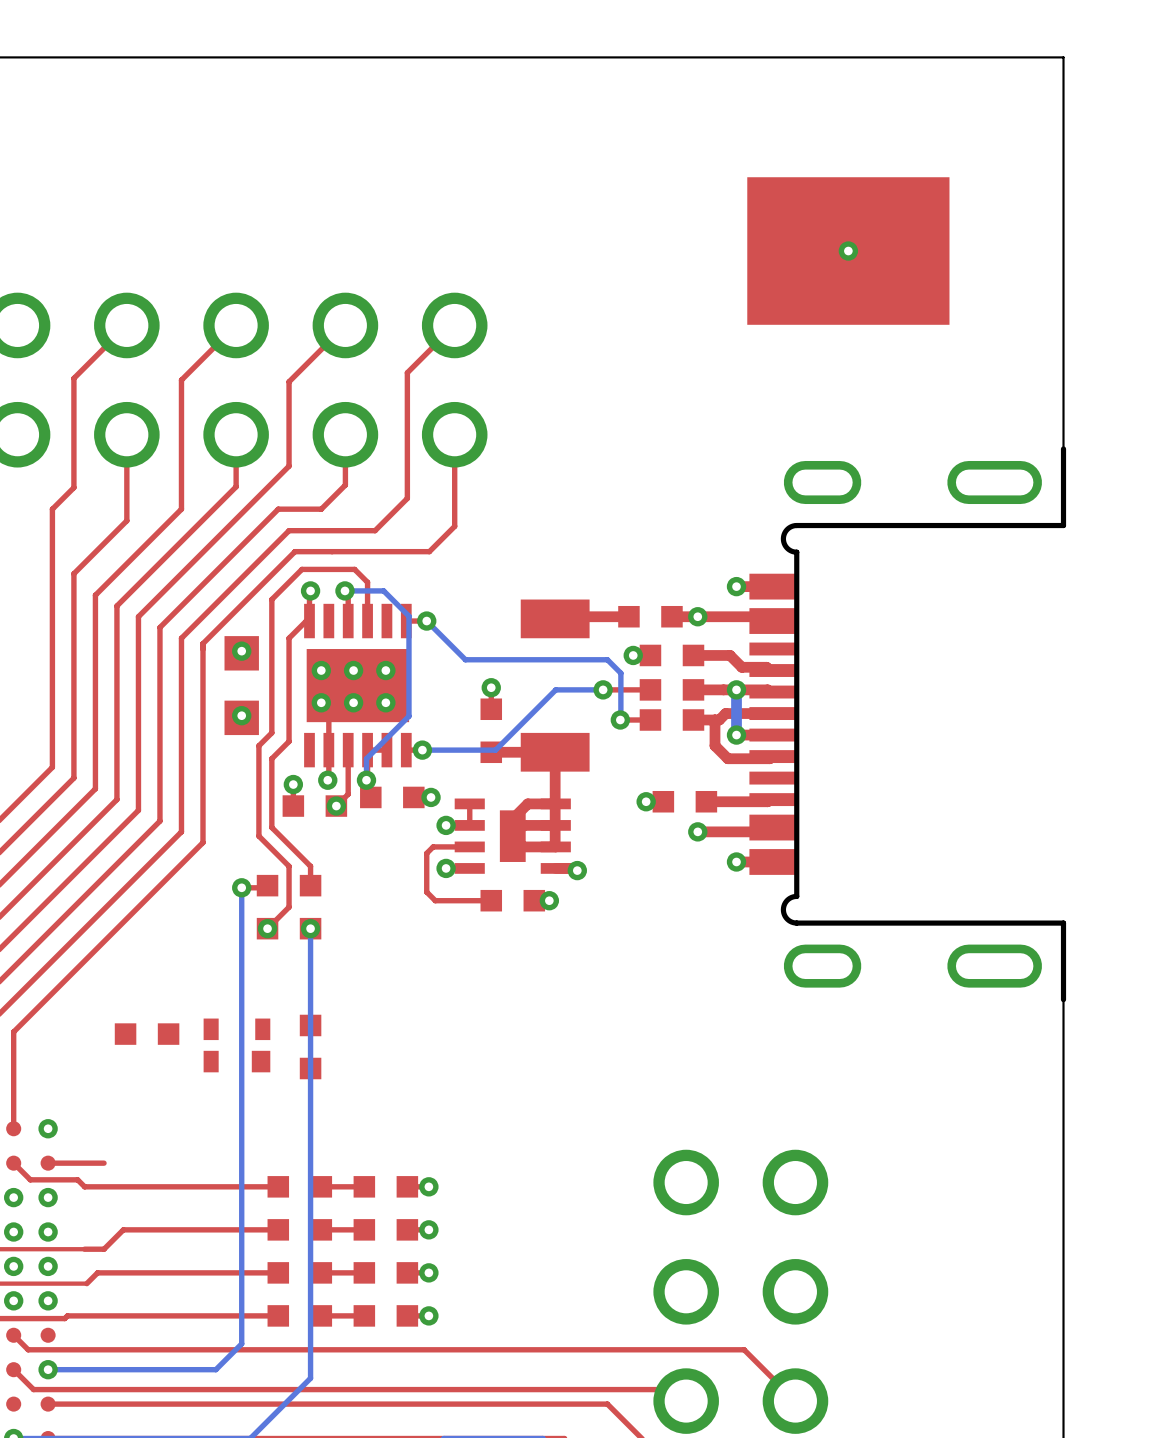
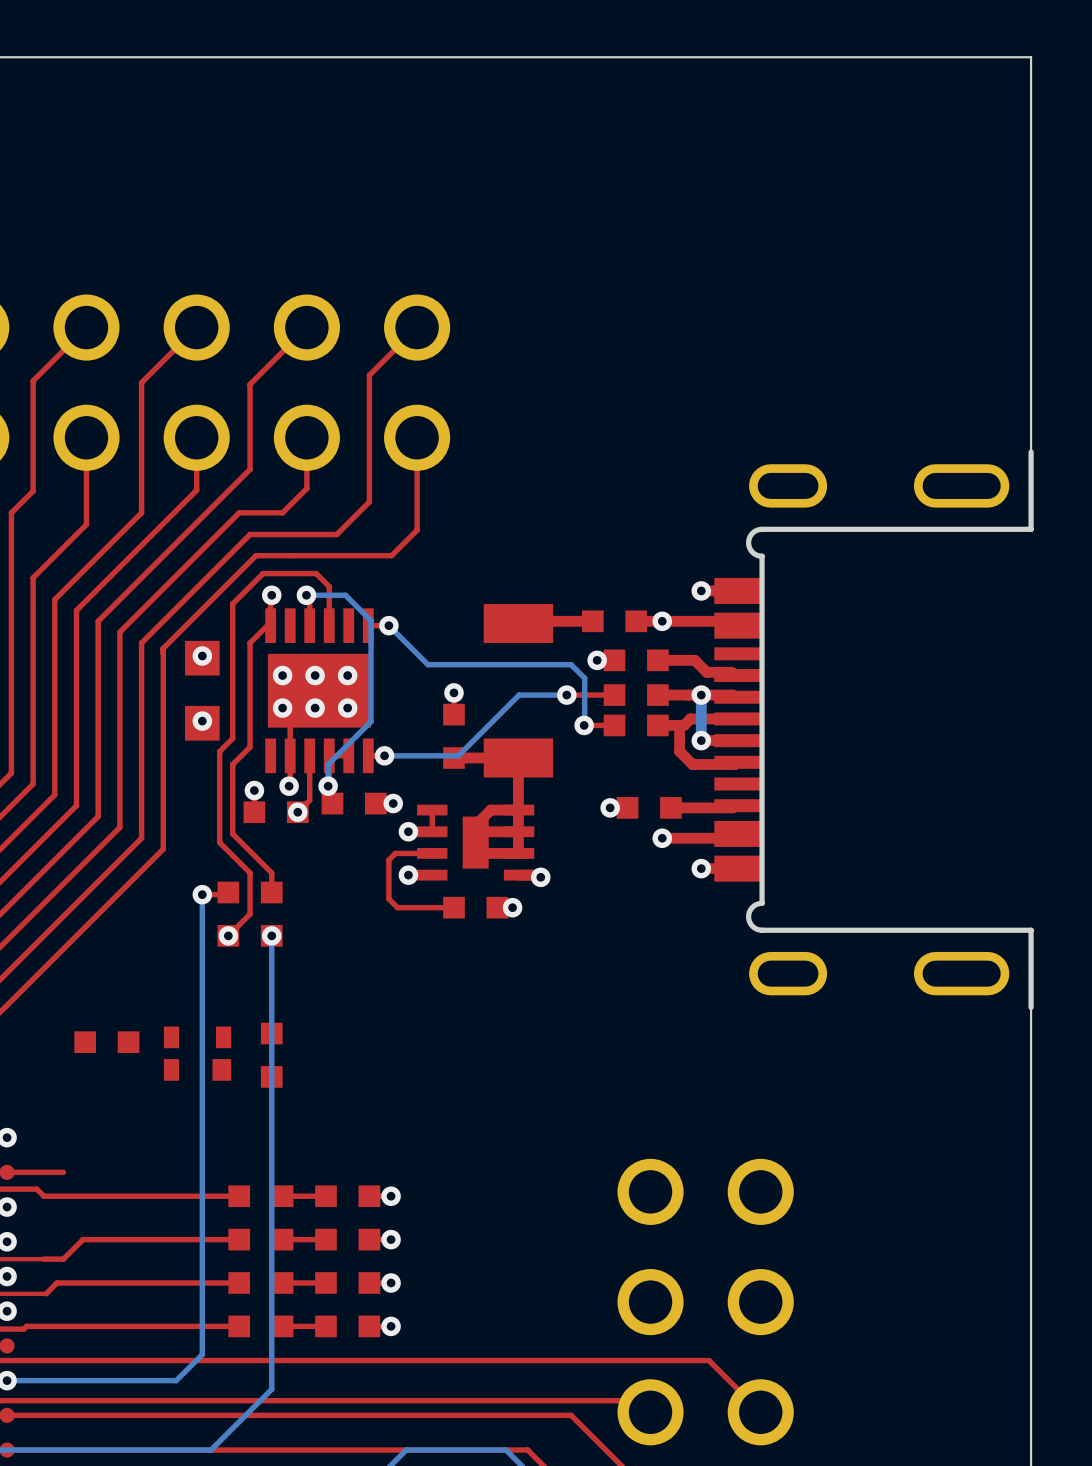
part: (848, 251) -> none
via: (848, 251) -> none

